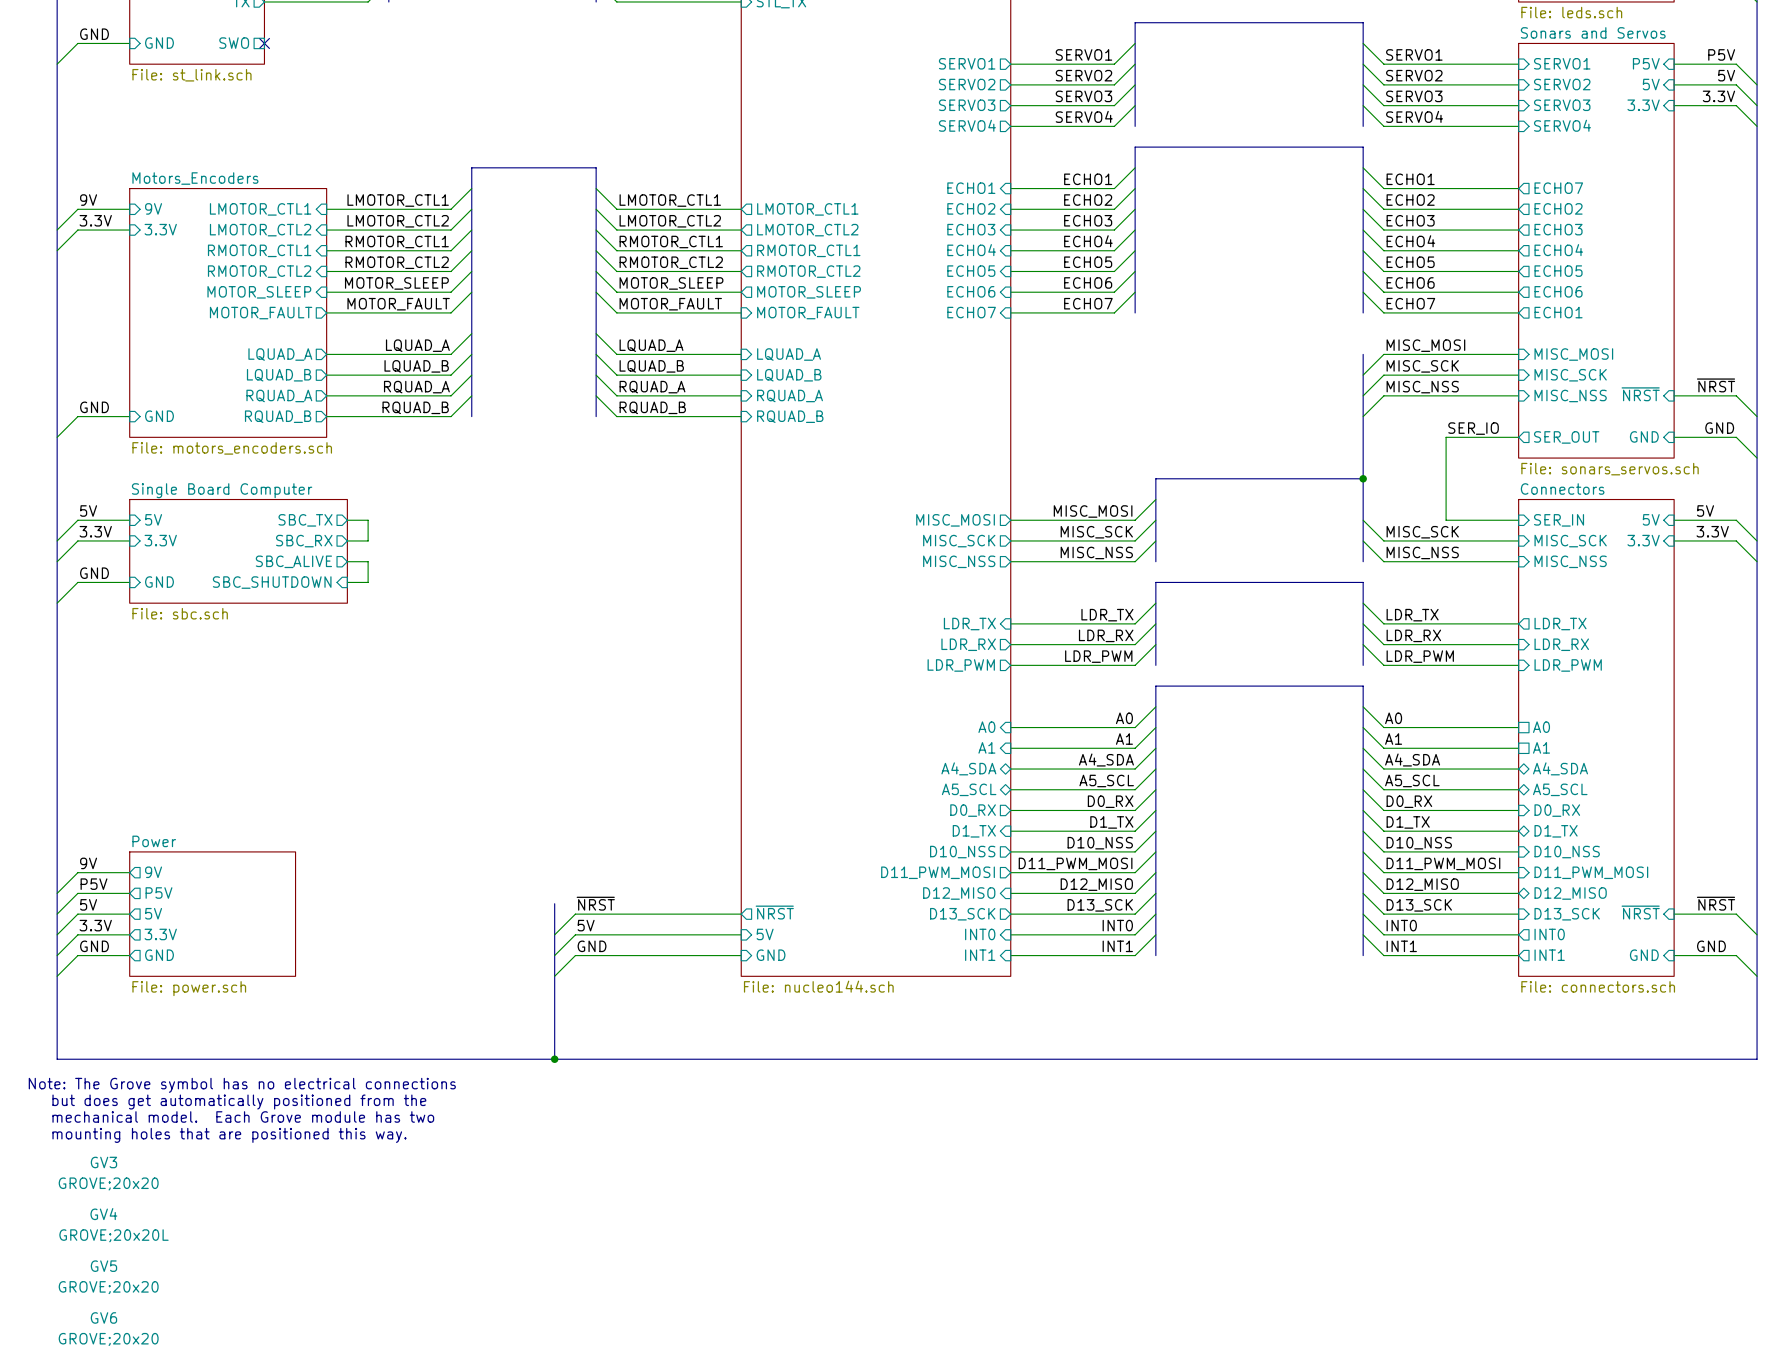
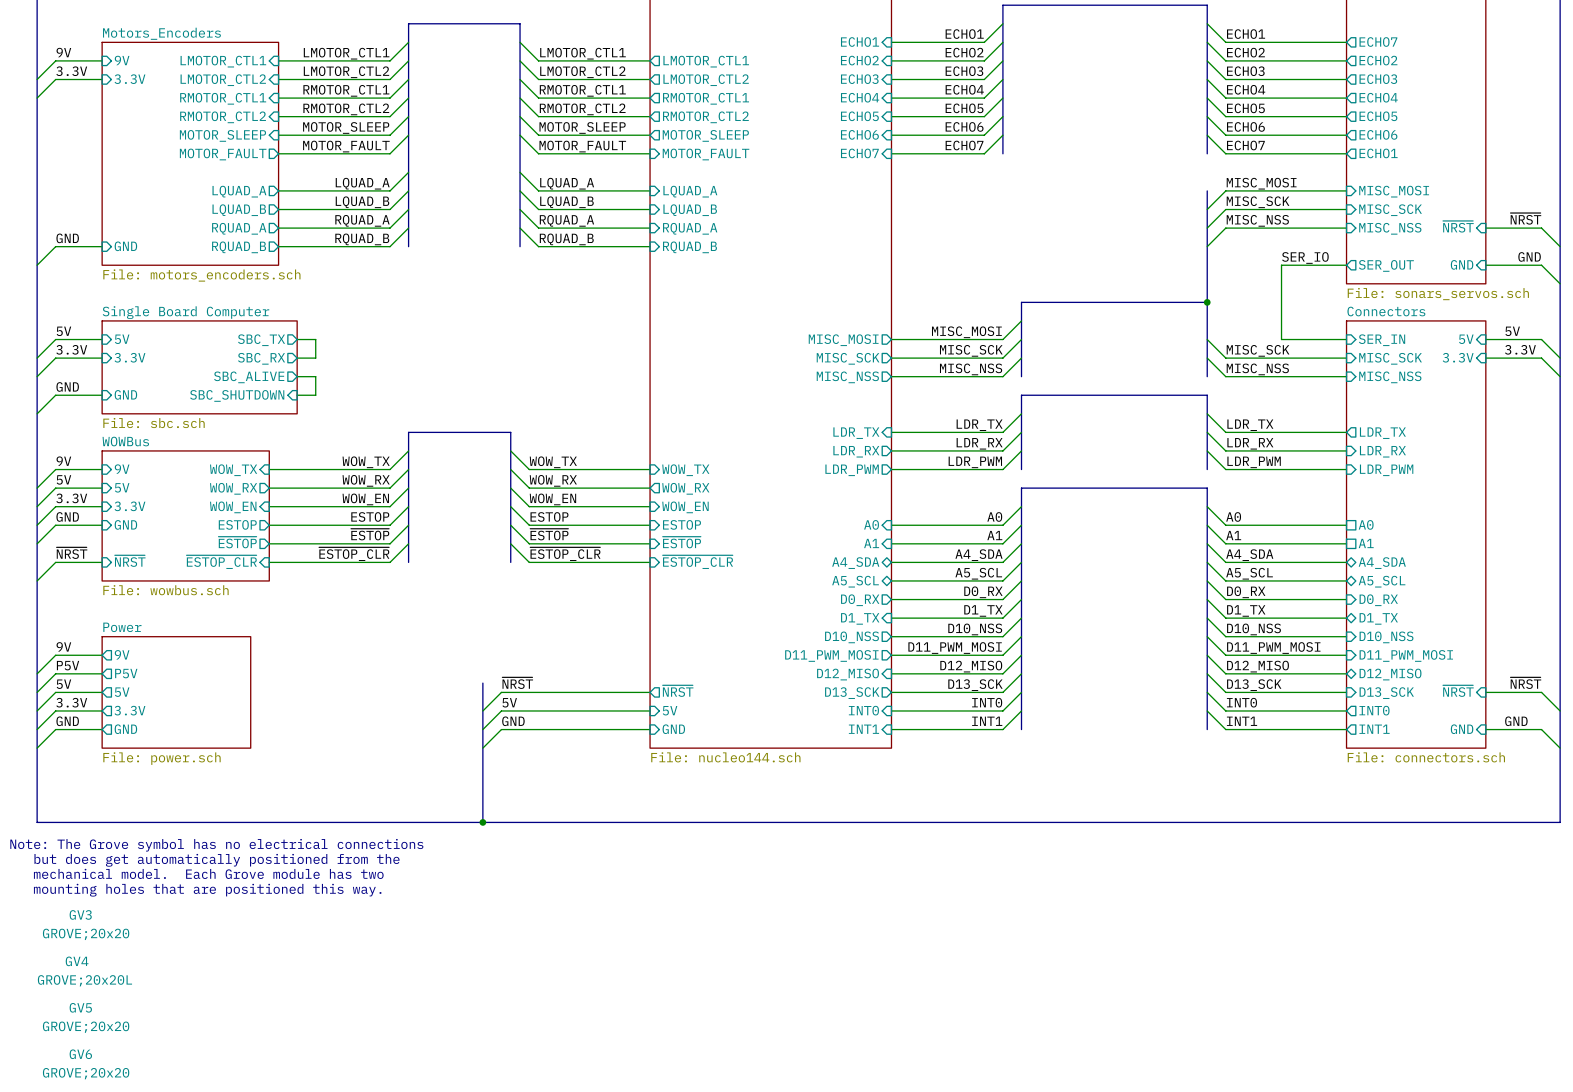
wire: none -> (408, 450) (390, 469) (269, 469)
wire: none -> (510, 450) (529, 469) (650, 469)
label: none -> 9V (63, 461)
label: none -> WOW_TX (366, 462)
label: none -> WOW_TX (553, 462)
sheet pin: none -> 9V (122, 469)
wire: none -> (102, 469) (55, 469) (37, 488)
sheet pin: none -> WOW_TX (233, 470)
wire: none -> (408, 469) (390, 488) (269, 488)
wire: none -> (510, 469) (529, 488) (650, 488)
sheet pin: none -> WOW_TX (685, 470)
label: none -> 5V (63, 479)
label: none -> WOW_RX (366, 480)
label: none -> WOW_RX (553, 480)
sheet pin: none -> 5V (122, 487)
wire: none -> (102, 488) (55, 488) (37, 506)
sheet pin: none -> WOW_RX (233, 488)
wire: none -> (408, 488) (390, 506) (269, 506)
wire: none -> (510, 488) (529, 506) (650, 506)
sheet pin: none -> WOW_RX (685, 488)
label: none -> 3.3V (71, 498)
label: none -> WOW_EN (365, 499)
label: none -> WOW_EN (552, 499)
wire: none -> (102, 506) (55, 506) (37, 525)
sheet pin: none -> 3.3V (129, 506)
sheet pin: none -> WOW_EN (233, 507)
wire: none -> (408, 506) (390, 525) (269, 525)
wire: none -> (510, 506) (529, 525) (650, 525)
sheet pin: none -> WOW_EN (685, 507)
sheet WOWBus: none -> File: wowbus.sch (185, 515)
label: none -> GND (67, 516)
label: none -> ESTOP (370, 516)
label: none -> ESTOP (549, 516)
wire: none -> (102, 525) (55, 525) (37, 543)
sheet pin: none -> GND (125, 524)
sheet pin: none -> ESTOP (237, 524)
wire: none -> (408, 525) (390, 543) (269, 543)
wire: none -> (510, 525) (529, 543) (650, 543)
sheet pin: none -> ESTOP (682, 524)
label: none -> ~{ESTOP} (370, 534)
label: none -> ~{ESTOP} (549, 534)
sheet pin: none -> ~{ESTOP} (237, 542)
sheet pin: none -> ~{ESTOP} (681, 542)
wire: none -> (408, 543) (390, 562) (269, 562)
wire: none -> (510, 543) (529, 562) (650, 562)
label: none -> ~{NRST} (71, 553)
label: none -> ~{ESTOP_CLR} (354, 554)
label: none -> ~{ESTOP_CLR} (565, 554)
sheet pin: none -> ~{NRST} (130, 561)
sheet pin: none -> ~{ESTOP_CLR} (221, 562)
sheet pin: none -> ~{ESTOP_CLR} (697, 562)
wire: none -> (102, 562) (55, 562) (37, 580)
bus: none -> (408, 562) (408, 432) (510, 432) (510, 562)

